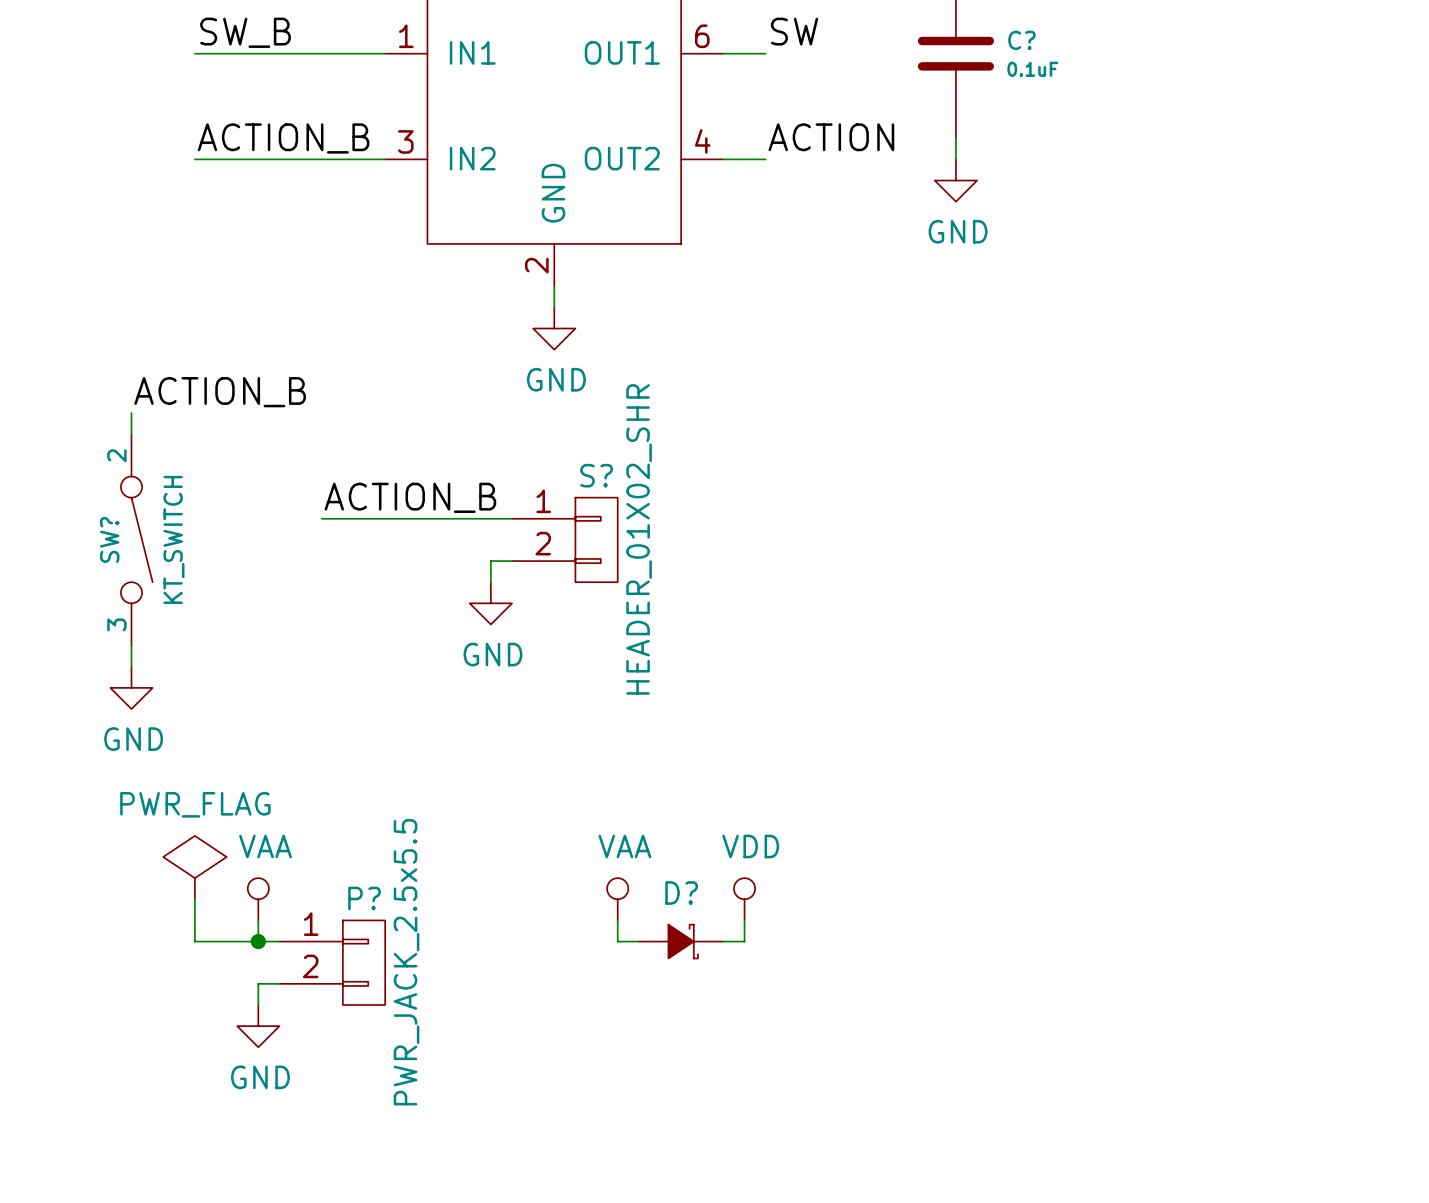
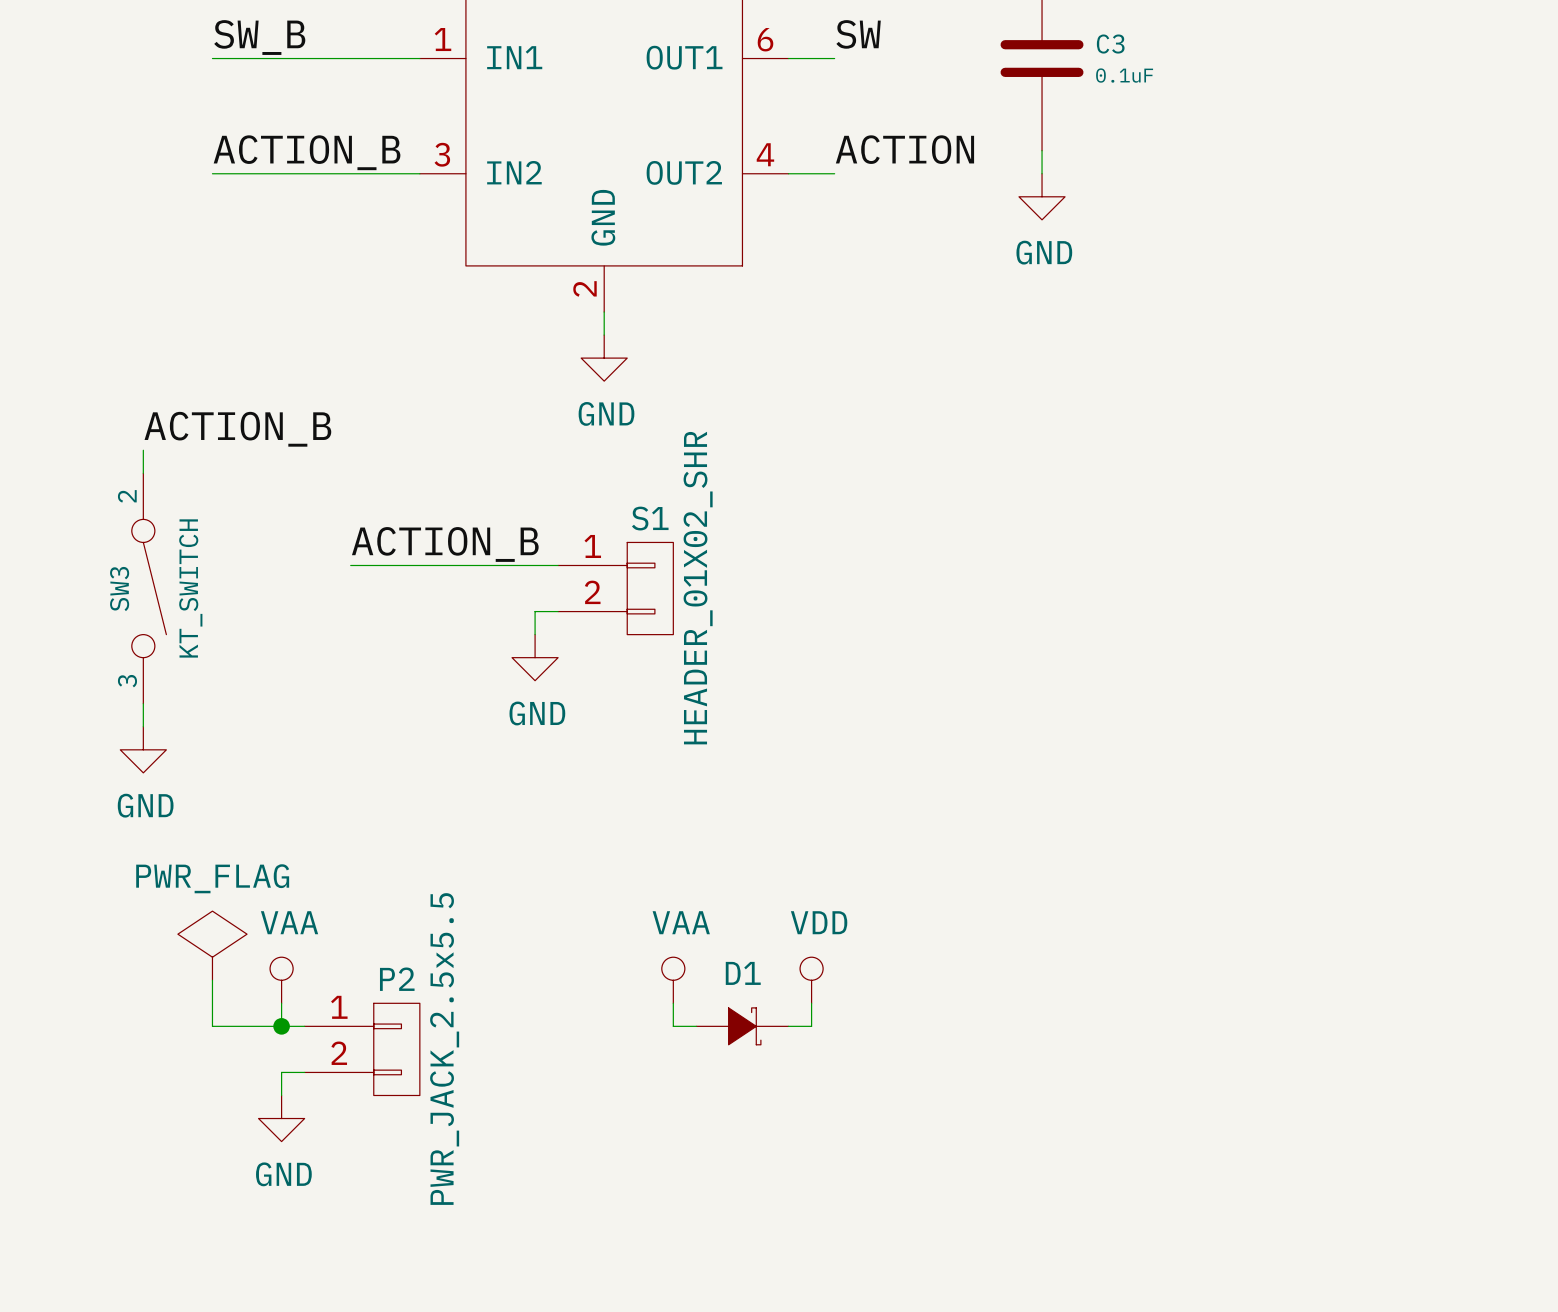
C? name: C? (1021, 40) -> C3 (1110, 44)
S? name: S? (596, 475) -> S1 (650, 518)
SW? name: SW? (109, 539) -> SW3 (119, 589)
D? name: D? (681, 893) -> D1 (743, 973)
P? name: P? (364, 898) -> P2 (397, 979)

